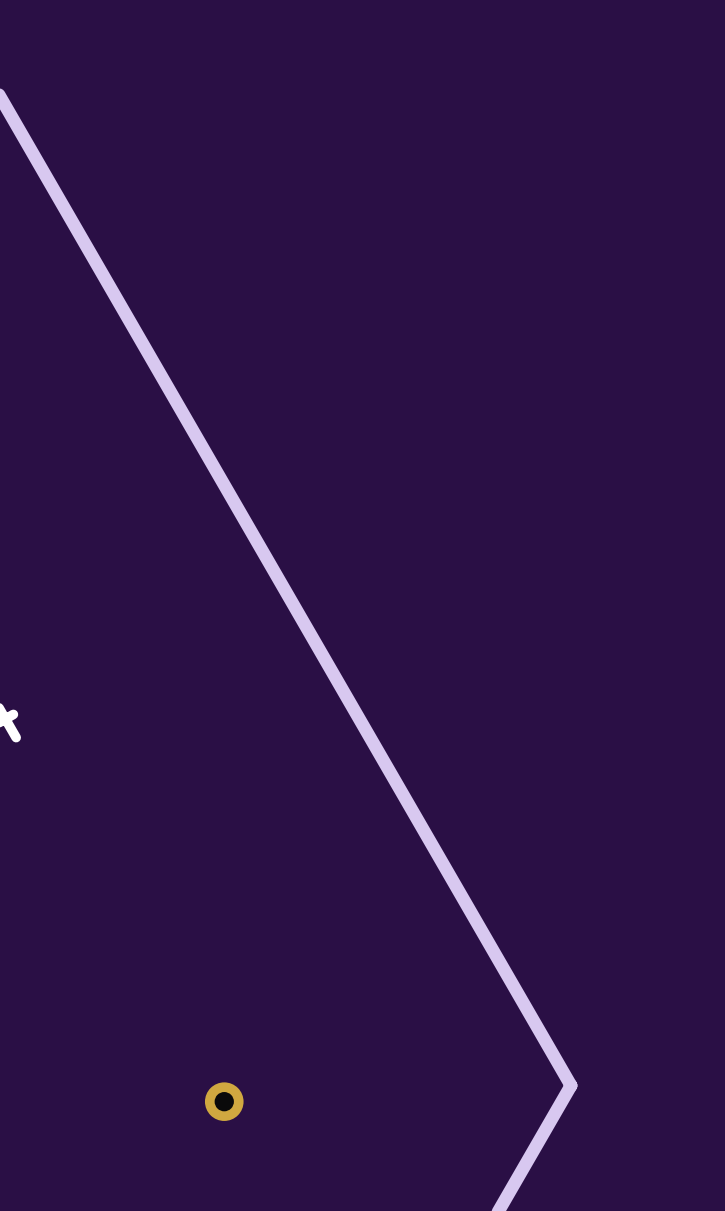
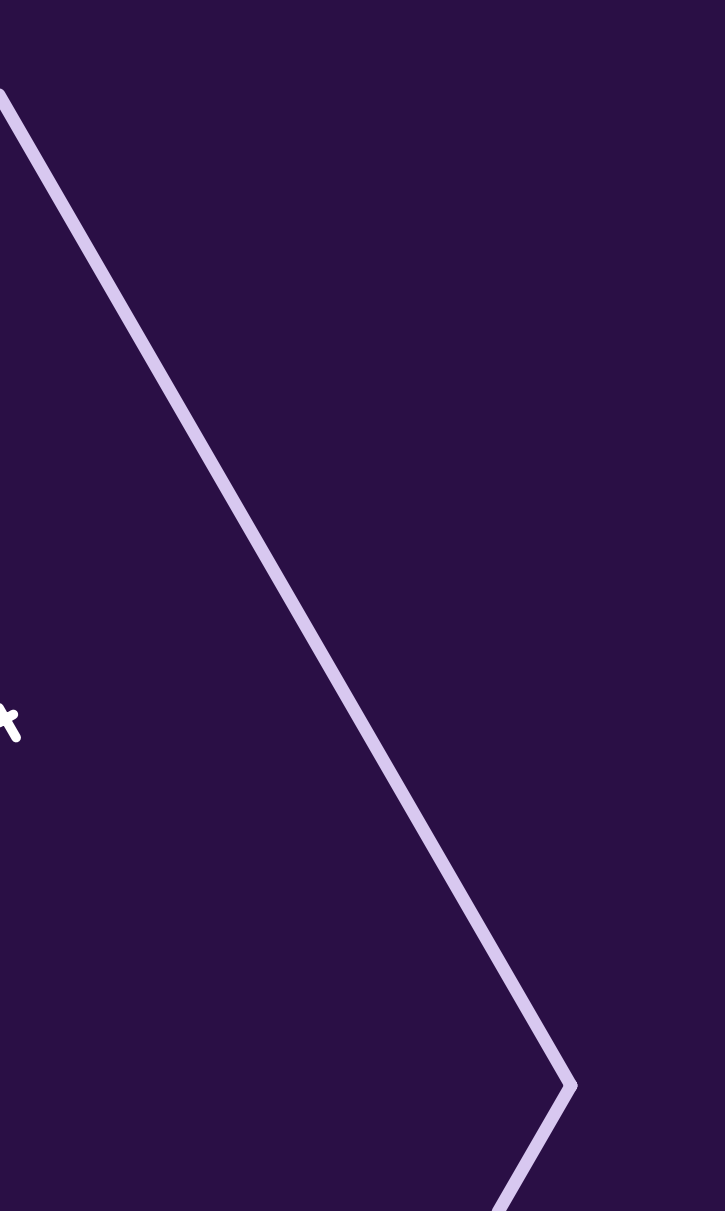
via: (224, 1101) -> none

